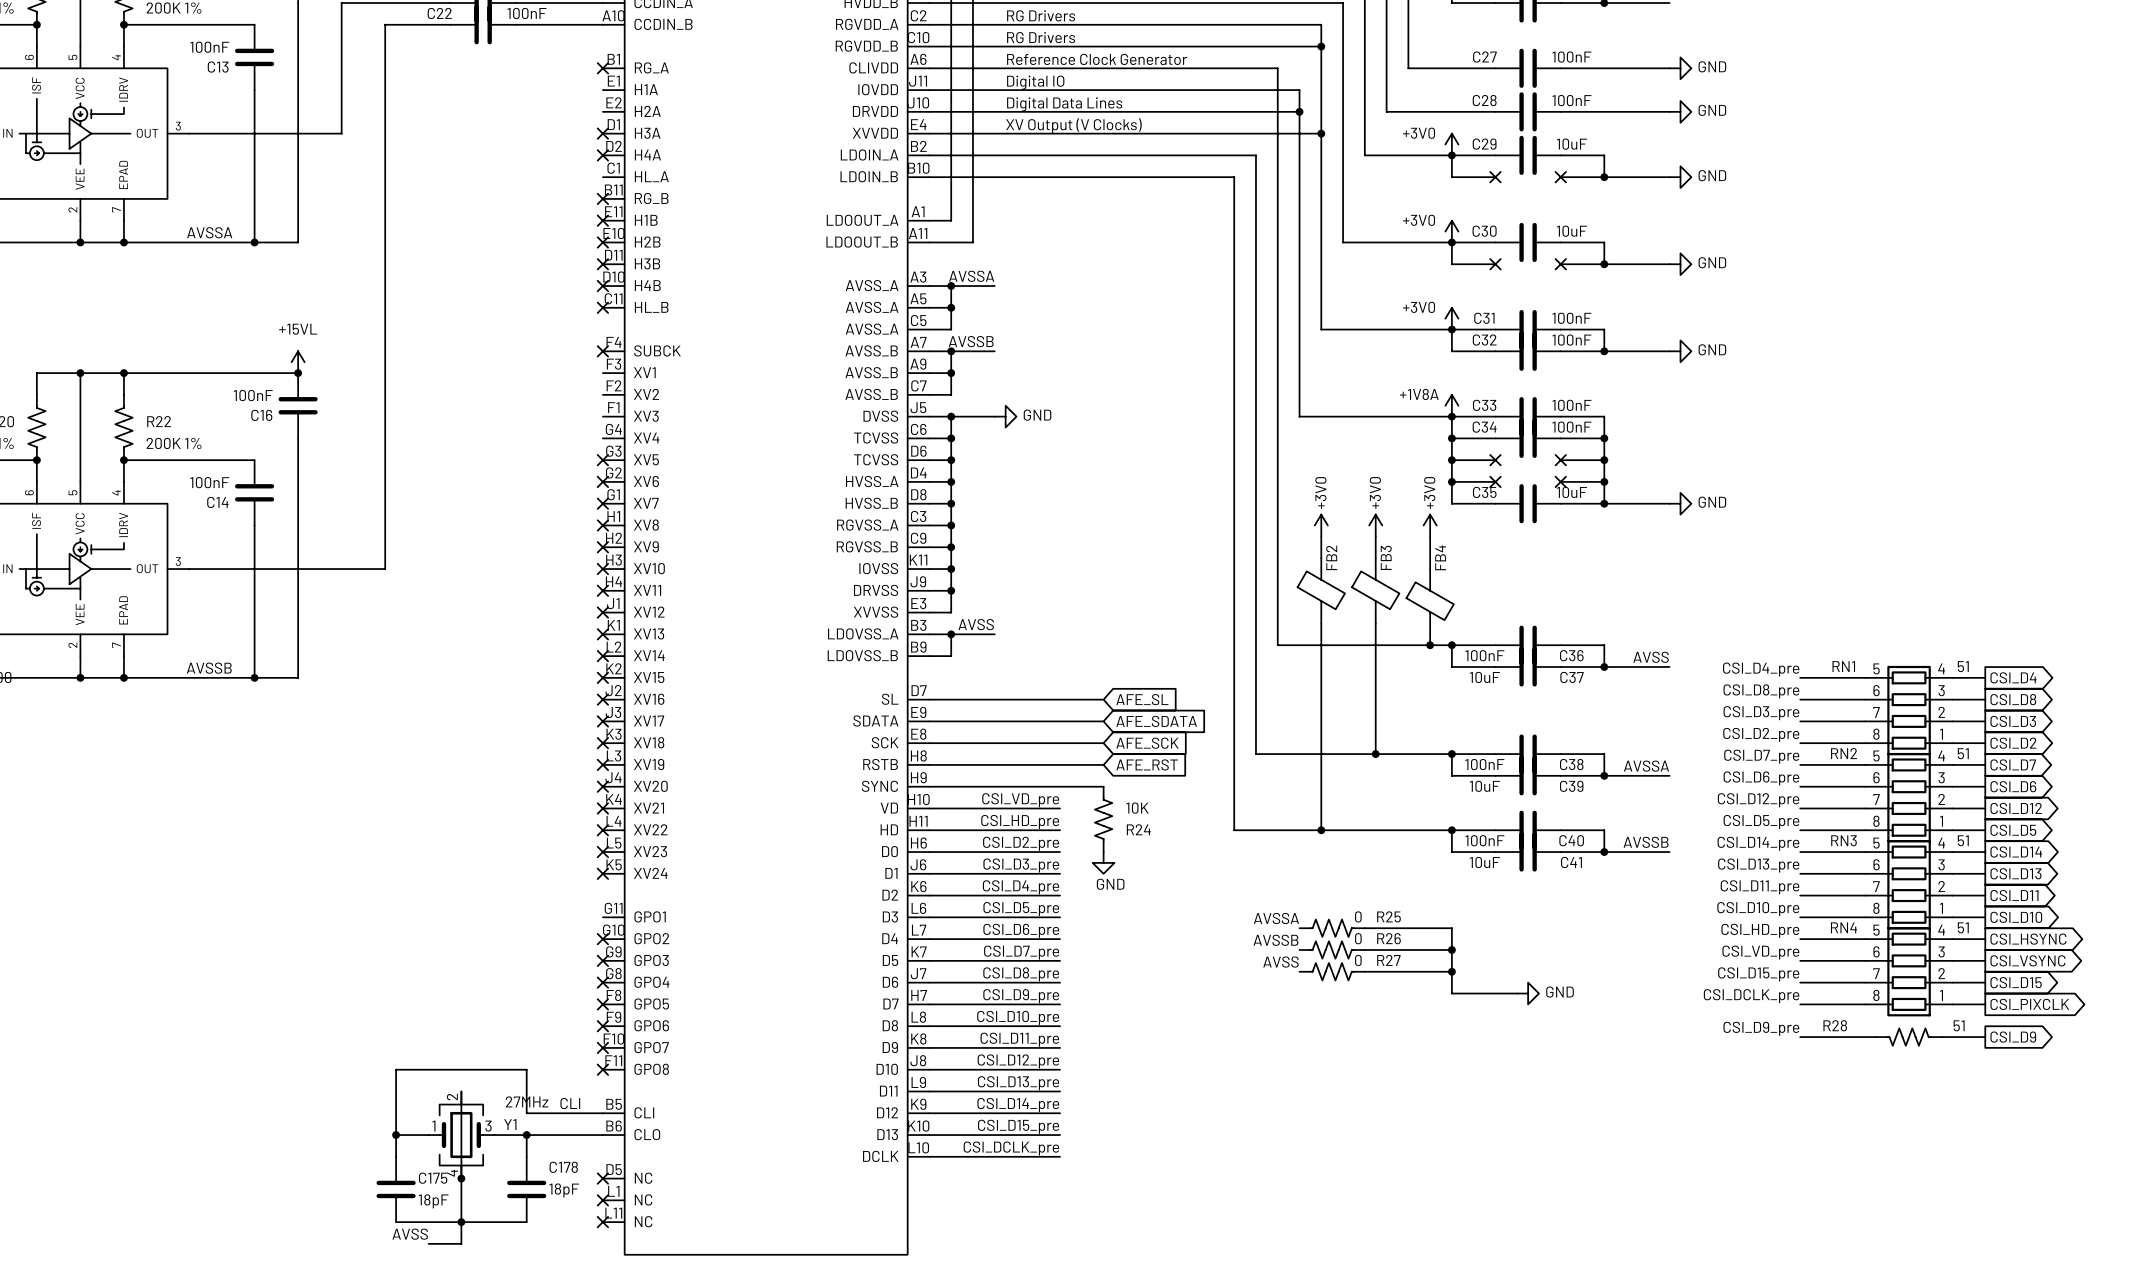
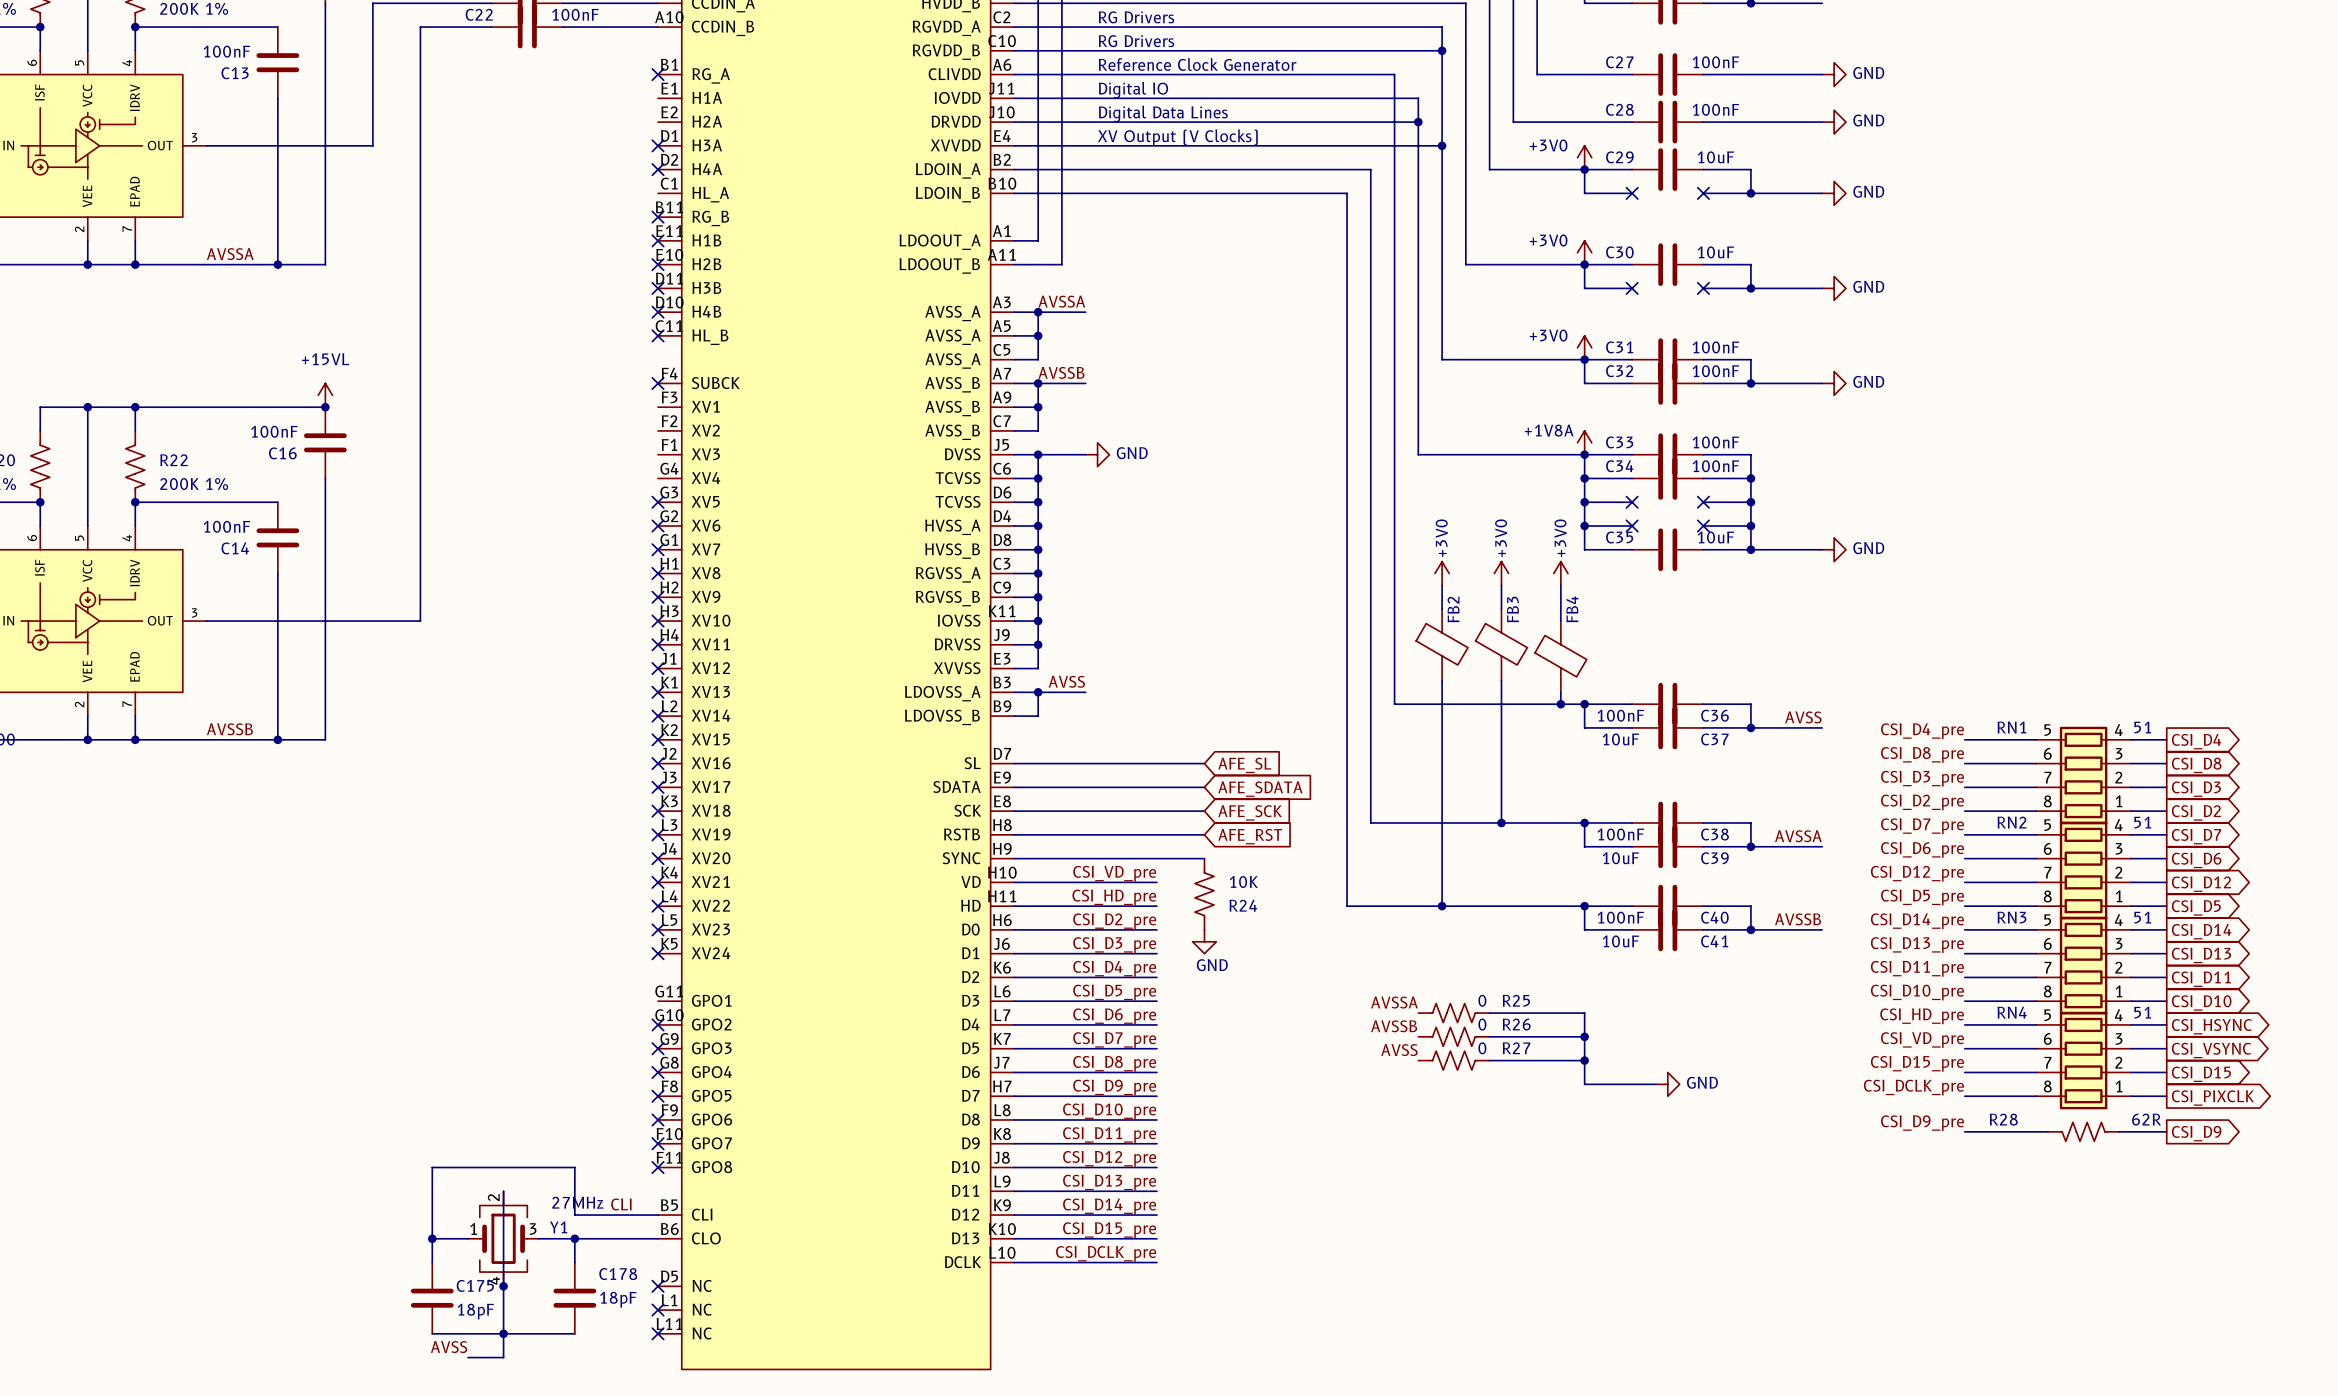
R28 value: 51 (1959, 1025) -> 62R (2146, 1119)

